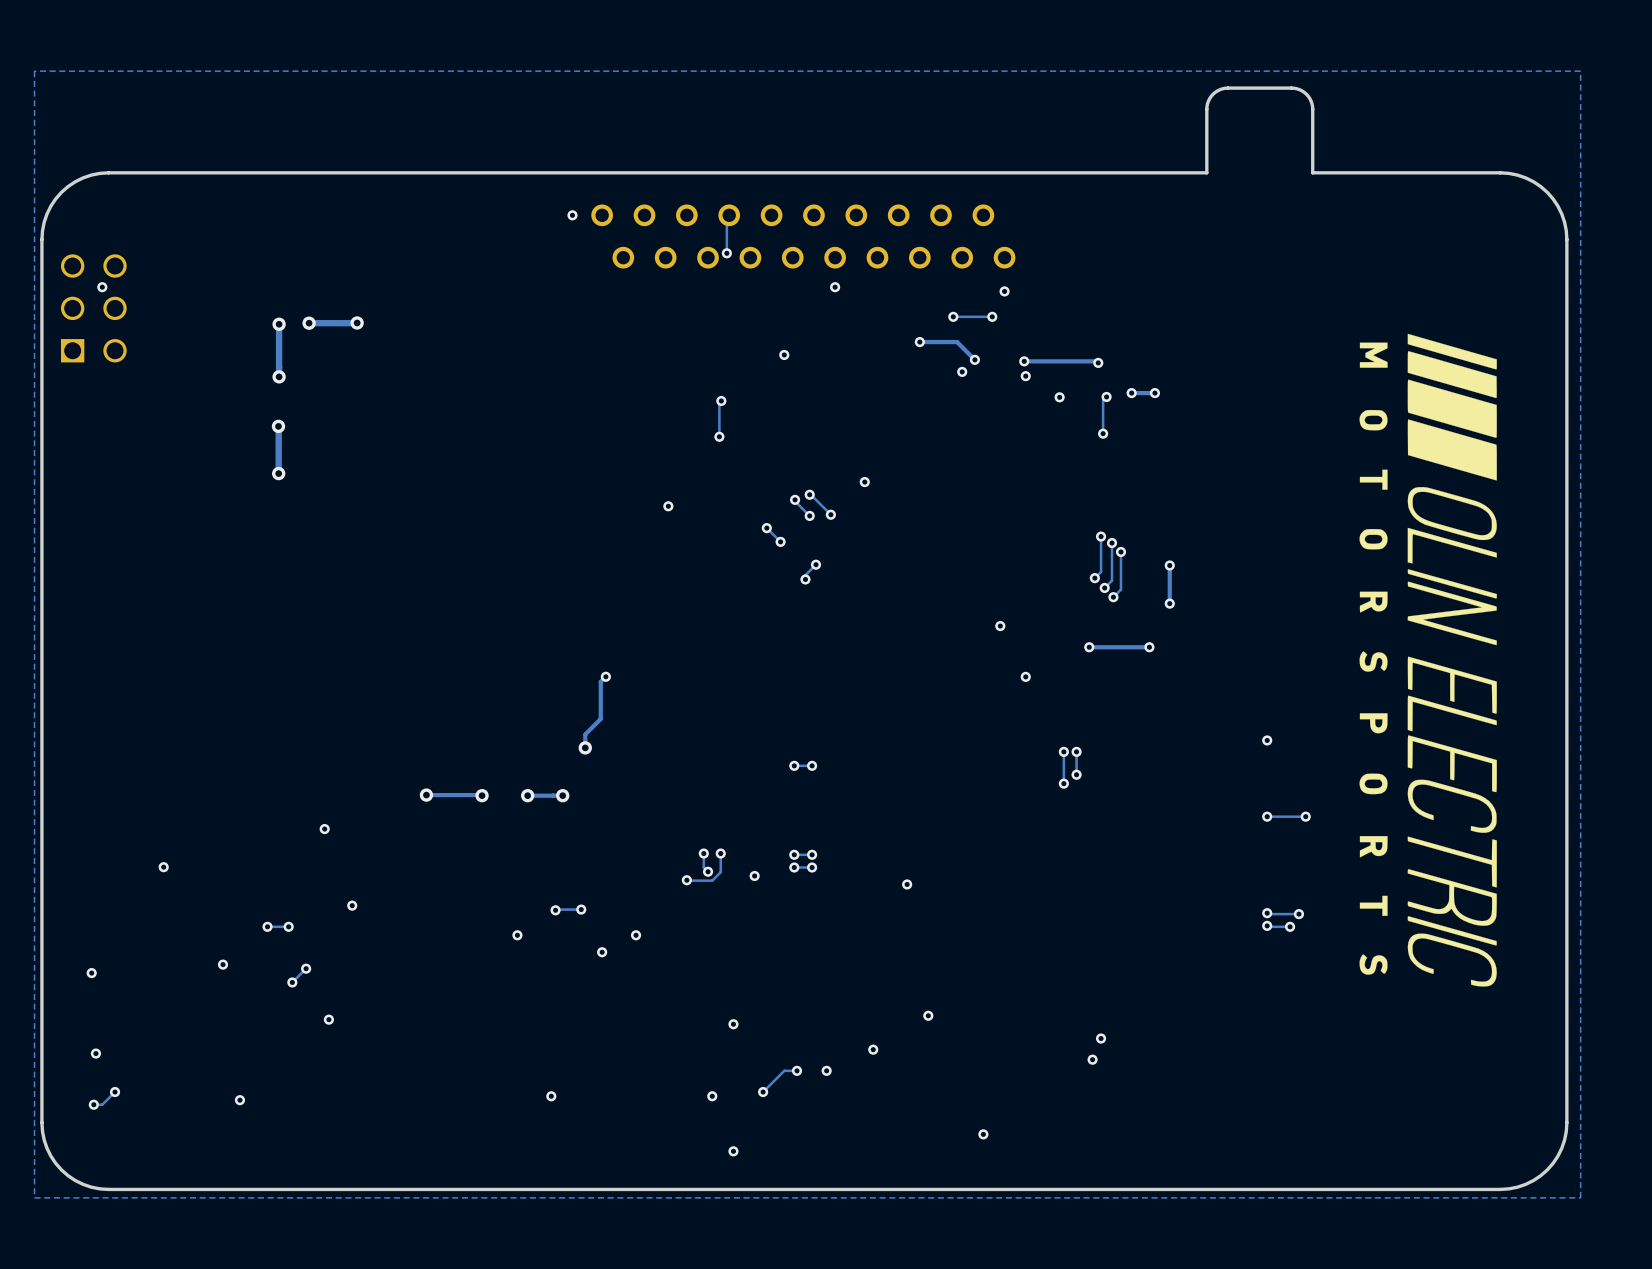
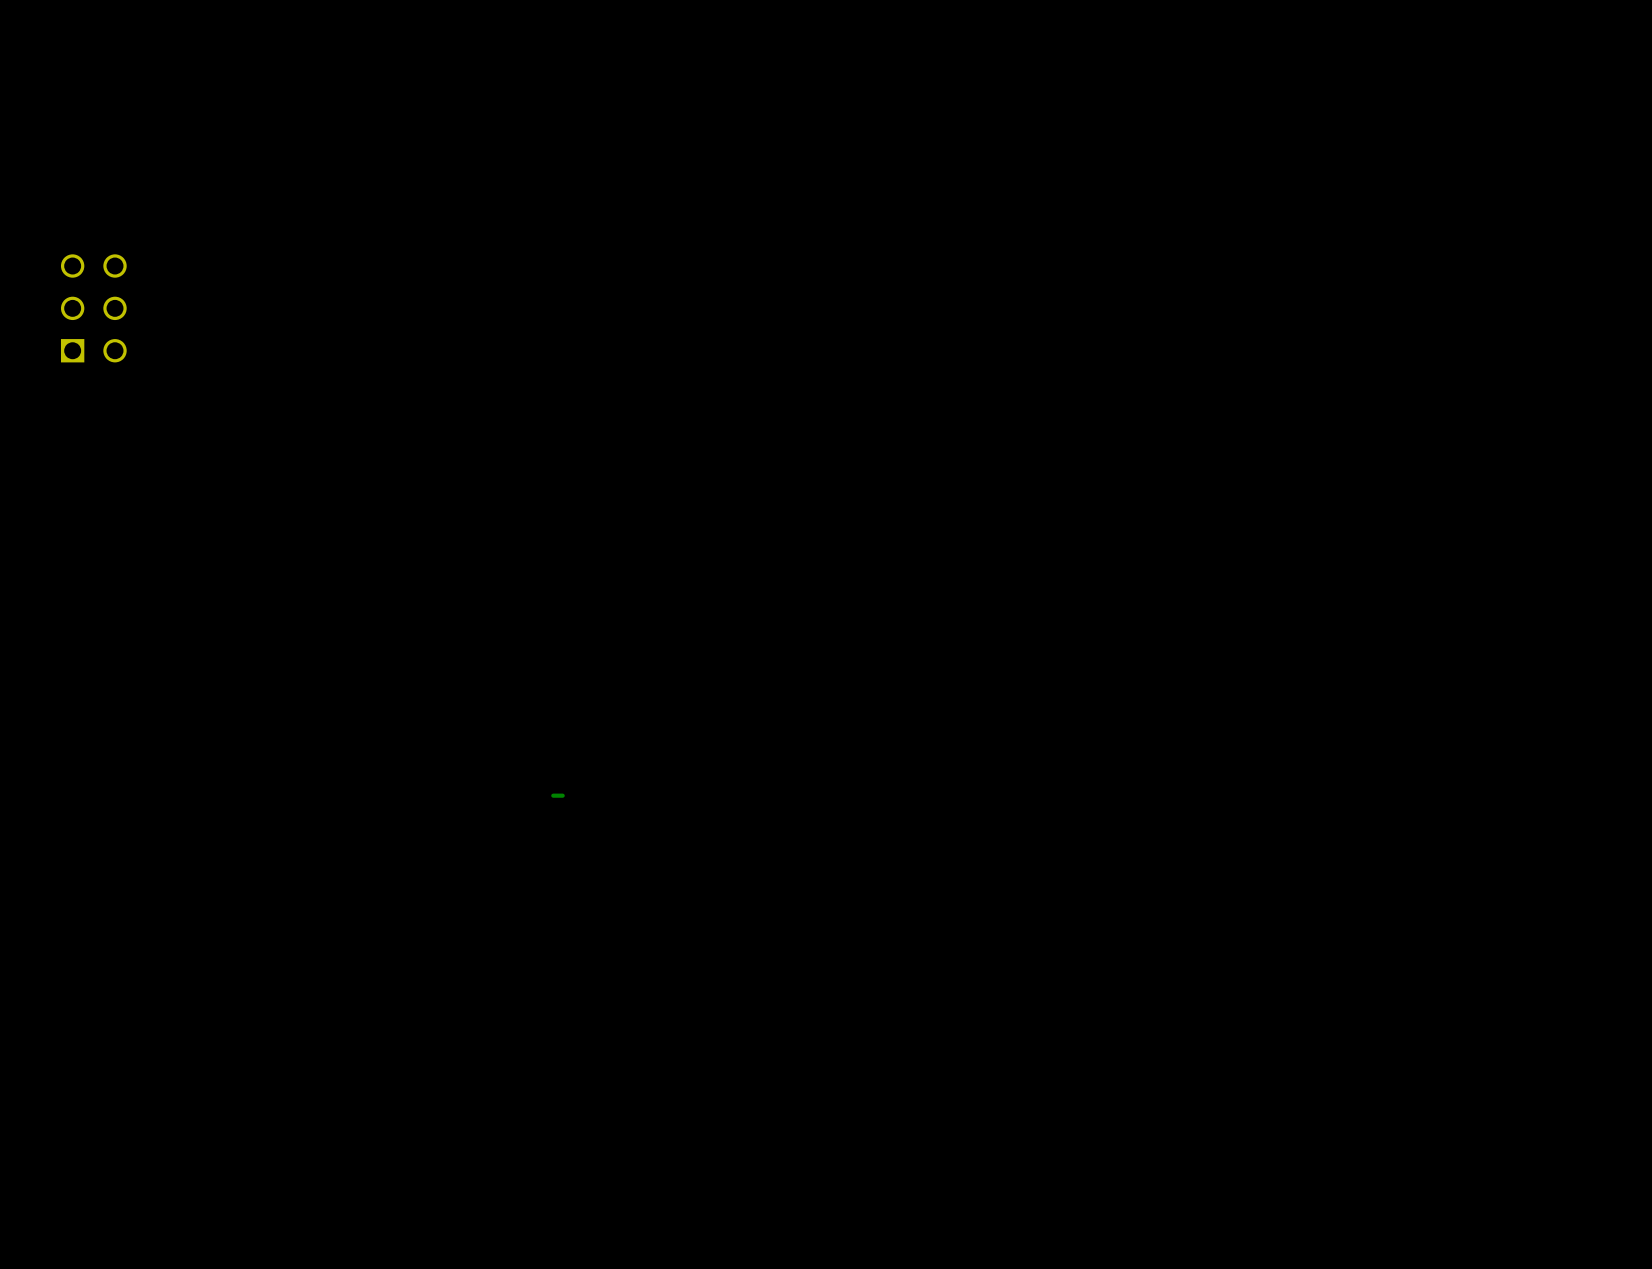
zone outline: (1580, 71) (1580, 1197) (34, 1197) (34, 71) (1580, 71) -> none
board edge: (1291, 88) (1225, 88) (1213, 94) (1207, 106) (1206, 172) (108, 172) (83, 177) (68, 186) (50, 206) (44, 222) (41, 239) (41, 1122) (47, 1148) (55, 1163) (68, 1175) (83, 1184) (108, 1189) (1500, 1189) (1517, 1187) (1540, 1175) (1553, 1163) (1561, 1148) (1566, 1122) (1566, 239) (1564, 222) (1557, 206) (1547, 192) (1533, 181) (1508, 173) (1312, 172) (1312, 103) (1304, 92) (1291, 88) -> none
via: (572, 215) -> none
track: (729, 215) (726, 217) (726, 253) -> none
part: (803, 236) -> none
via: (726, 253) -> none
via: (102, 287) -> none
via: (835, 287) -> none
via: (1004, 291) -> none
via: (953, 316) -> none
track: (992, 316) (953, 316) -> none
via: (992, 316) -> none
via: (357, 322) -> none
via: (309, 323) -> none
track: (356, 323) (309, 323) -> none
track: (279, 324) (279, 376) -> none
via: (279, 324) -> none
drawing: [1359, 333, 1497, 987] -> none
track: (919, 342) (957, 342) (974, 359) -> none
via: (919, 342) -> none
via: (784, 354) -> none
via: (974, 359) -> none
track: (1024, 361) (1096, 361) (1098, 362) -> none
via: (1024, 361) -> none
via: (1098, 362) -> none
via: (962, 371) -> none
via: (279, 376) -> none
via: (1025, 376) -> none
via: (1131, 393) -> none
track: (1154, 393) (1131, 393) -> none
via: (1154, 393) -> none
track: (1106, 396) (1103, 400) (1103, 433) -> none
via: (1106, 396) -> none
via: (1059, 397) -> none
track: (721, 400) (719, 402) (719, 436) -> none
via: (721, 400) -> none
track: (278, 426) (278, 473) -> none
via: (278, 426) -> none
via: (1103, 433) -> none
via: (719, 436) -> none
via: (278, 473) -> none
via: (864, 482) -> none
track: (809, 494) (830, 514) -> none
via: (809, 494) -> none
track: (795, 499) (809, 515) -> none
via: (795, 499) -> none
via: (668, 506) -> none
via: (830, 514) -> none
via: (809, 515) -> none
track: (766, 528) (780, 541) -> none
via: (766, 528) -> none
track: (1101, 536) (1101, 571) (1094, 578) -> none
via: (1101, 536) -> none
via: (780, 541) -> none
track: (1112, 543) (1112, 580) (1104, 587) -> none
via: (1112, 543) -> none
track: (1120, 552) (1120, 589) (1113, 597) -> none
via: (1120, 552) -> none
track: (816, 564) (805, 575) (805, 579) -> none
via: (816, 564) -> none
track: (1169, 565) (1169, 603) -> none
via: (1169, 565) -> none
via: (1094, 578) -> none
via: (805, 579) -> none
via: (1104, 587) -> none
via: (1113, 597) -> none
via: (1169, 603) -> none
via: (1000, 626) -> none
via: (1089, 647) -> none
track: (1149, 647) (1089, 647) -> none
via: (1149, 647) -> none
track: (605, 676) (600, 681) (600, 718) (585, 734) (585, 747) -> none
via: (605, 676) -> none
via: (1025, 676) -> none
via: (1267, 740) -> none
via: (585, 747) -> none
track: (1063, 751) (1063, 783) -> none
via: (1063, 751) -> none
track: (1076, 751) (1076, 774) -> none
via: (1076, 751) -> none
via: (794, 765) -> none
track: (812, 765) (794, 765) -> none
via: (812, 765) -> none
via: (1076, 774) -> none
via: (1063, 783) -> none
track: (426, 795) (482, 795) -> none
via: (426, 795) -> none
via: (482, 795) -> none
via: (527, 795) -> none
track: (553, 795) (527, 795) -> none
via: (562, 795) -> none
via: (1267, 816) -> none
track: (1305, 816) (1267, 816) -> none
via: (1305, 816) -> none
via: (324, 829) -> none
track: (703, 853) (703, 867) (708, 871) -> none
via: (703, 853) -> none
track: (720, 853) (720, 872) (712, 880) (686, 880) -> none
via: (720, 853) -> none
via: (794, 854) -> none
track: (812, 854) (794, 854) -> none
via: (812, 854) -> none
via: (163, 867) -> none
via: (794, 867) -> none
track: (812, 867) (794, 867) -> none
via: (812, 867) -> none
via: (708, 871) -> none
via: (754, 875) -> none
via: (686, 880) -> none
via: (907, 884) -> none
via: (352, 905) -> none
track: (581, 909) (555, 910) -> none
via: (581, 909) -> none
via: (555, 910) -> none
track: (1267, 913) (1298, 914) -> none
via: (1267, 913) -> none
via: (1298, 914) -> none
track: (1267, 925) (1290, 926) -> none
via: (1267, 925) -> none
via: (267, 926) -> none
track: (288, 926) (267, 926) -> none
via: (288, 926) -> none
via: (1290, 926) -> none
via: (517, 935) -> none
via: (636, 935) -> none
via: (602, 952) -> none
via: (223, 964) -> none
track: (306, 968) (292, 982) -> none
via: (306, 968) -> none
via: (91, 973) -> none
via: (292, 982) -> none
via: (928, 1015) -> none
via: (328, 1019) -> none
via: (733, 1024) -> none
via: (1101, 1038) -> none
via: (873, 1049) -> none
via: (95, 1053) -> none
via: (1092, 1059) -> none
track: (797, 1070) (784, 1070) (763, 1092) -> none
via: (797, 1070) -> none
via: (826, 1070) -> none
track: (115, 1092) (102, 1104) (93, 1104) -> none
via: (115, 1092) -> none
via: (763, 1092) -> none
via: (551, 1096) -> none
via: (712, 1096) -> none
via: (239, 1100) -> none
via: (93, 1104) -> none
via: (983, 1134) -> none
via: (733, 1151) -> none

